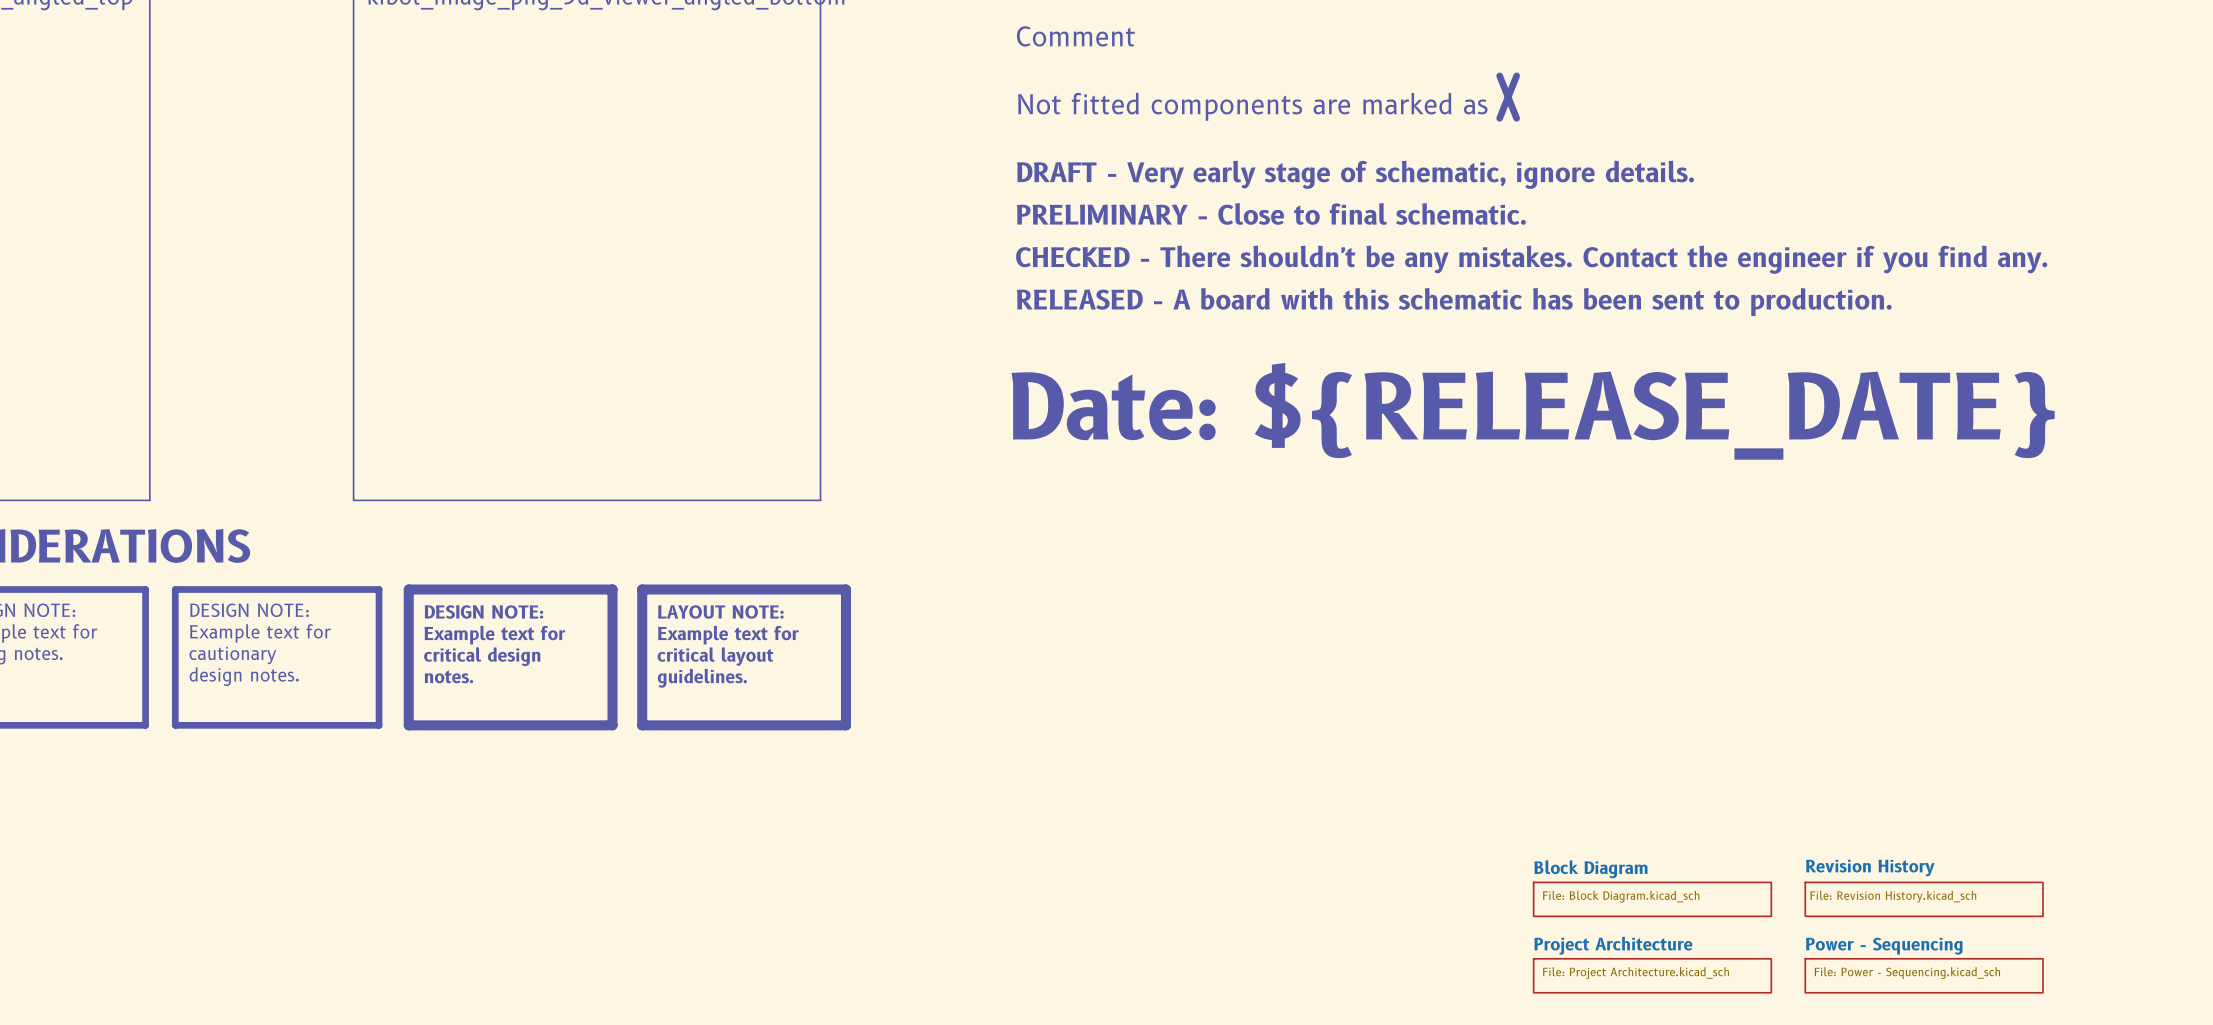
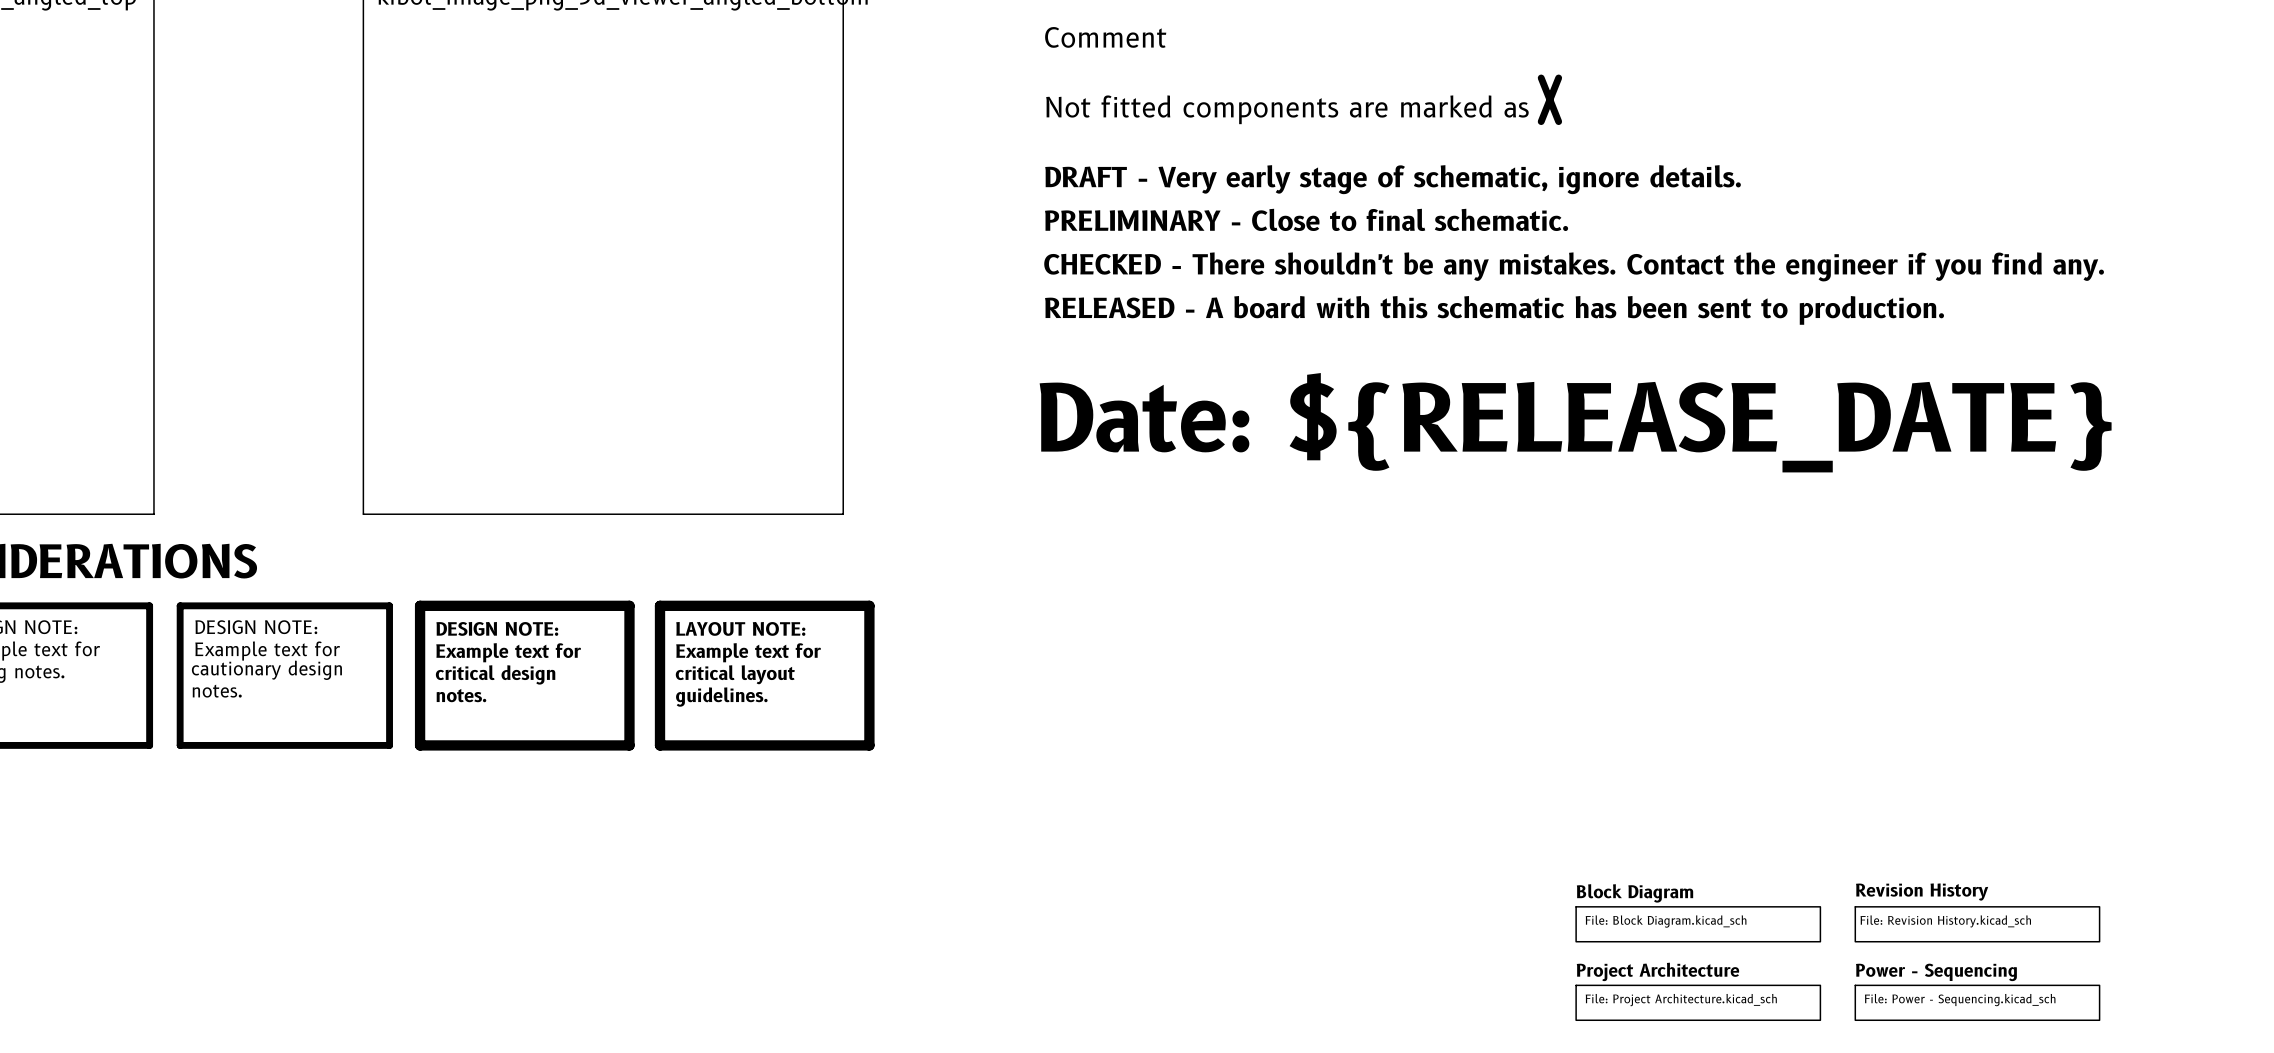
text: cautionary (232, 655) -> cautionary design (266, 670)
text: design notes. (244, 676) -> notes. (217, 691)

